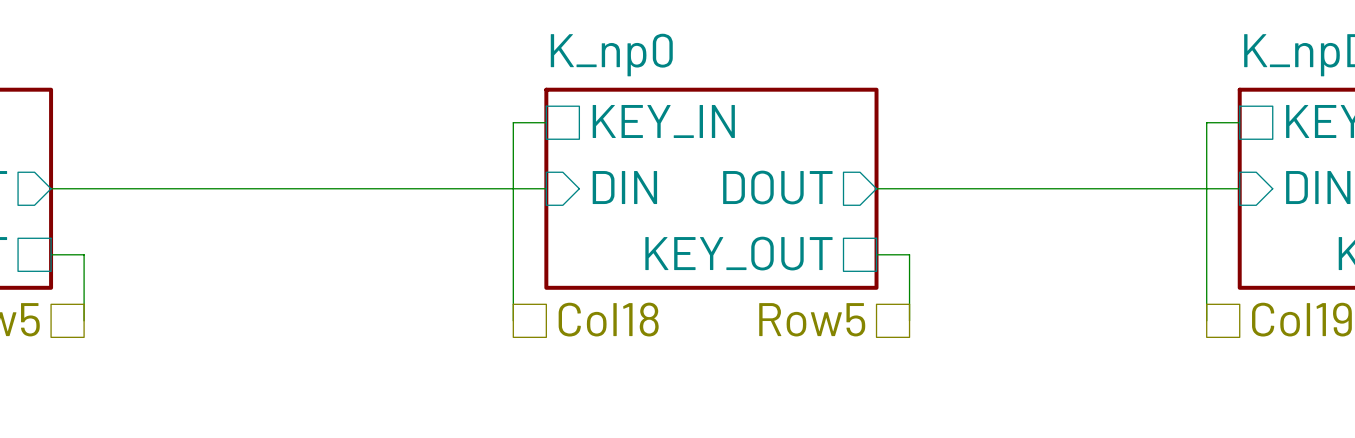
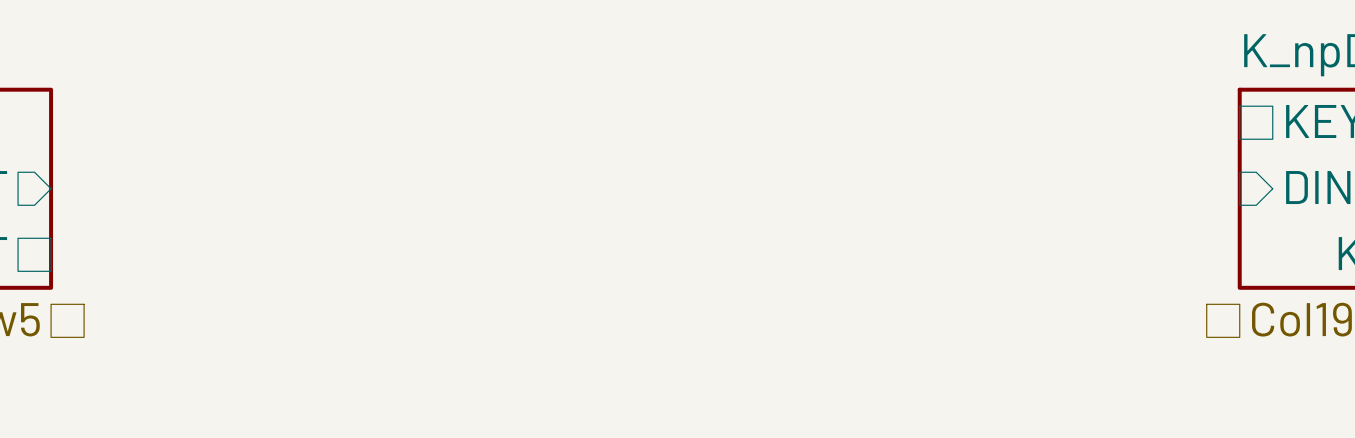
sheet pin: KEY_IN (663, 121) -> none
wire: (546, 122) (513, 122) (513, 320) -> none
wire: (1239, 122) (1206, 122) (1206, 320) -> none
sheet pin: DIN (624, 187) -> none
sheet pin: DOUT (777, 187) -> none
wire: (51, 188) (546, 188) -> none
sheet K_np0: (711, 188) -> none
wire: (876, 188) (1239, 188) -> none
sheet pin: KEY_OUT (738, 253) -> none
wire: (51, 254) (84, 254) (84, 320) -> none
wire: (876, 254) (909, 254) (909, 320) -> none
hierarchical label: Col18 (608, 319) -> none
hierarchical label: Row5 (812, 319) -> none

